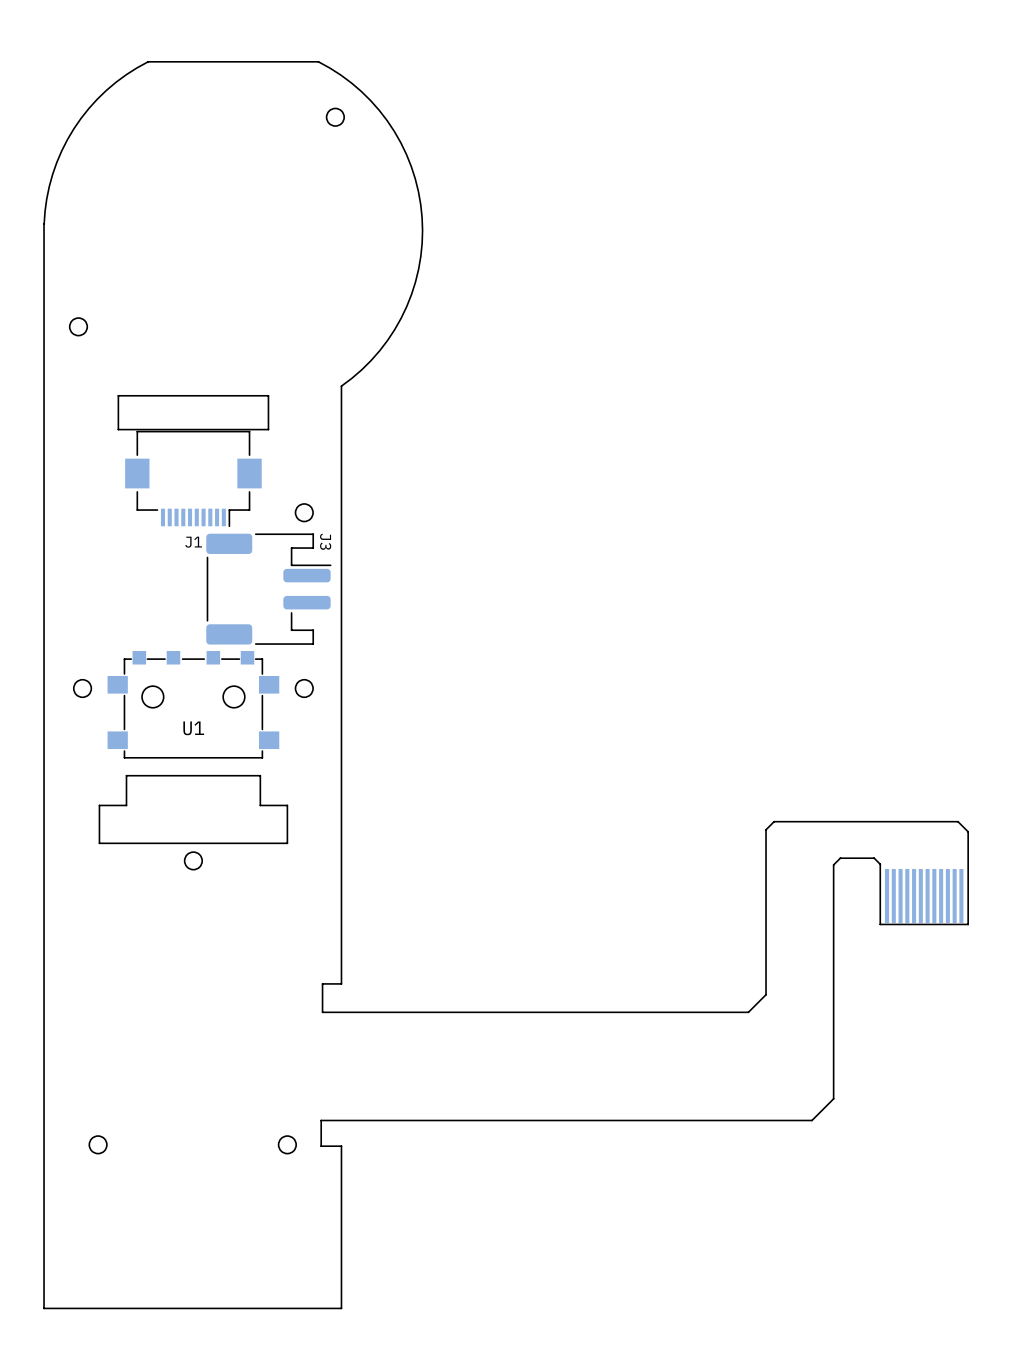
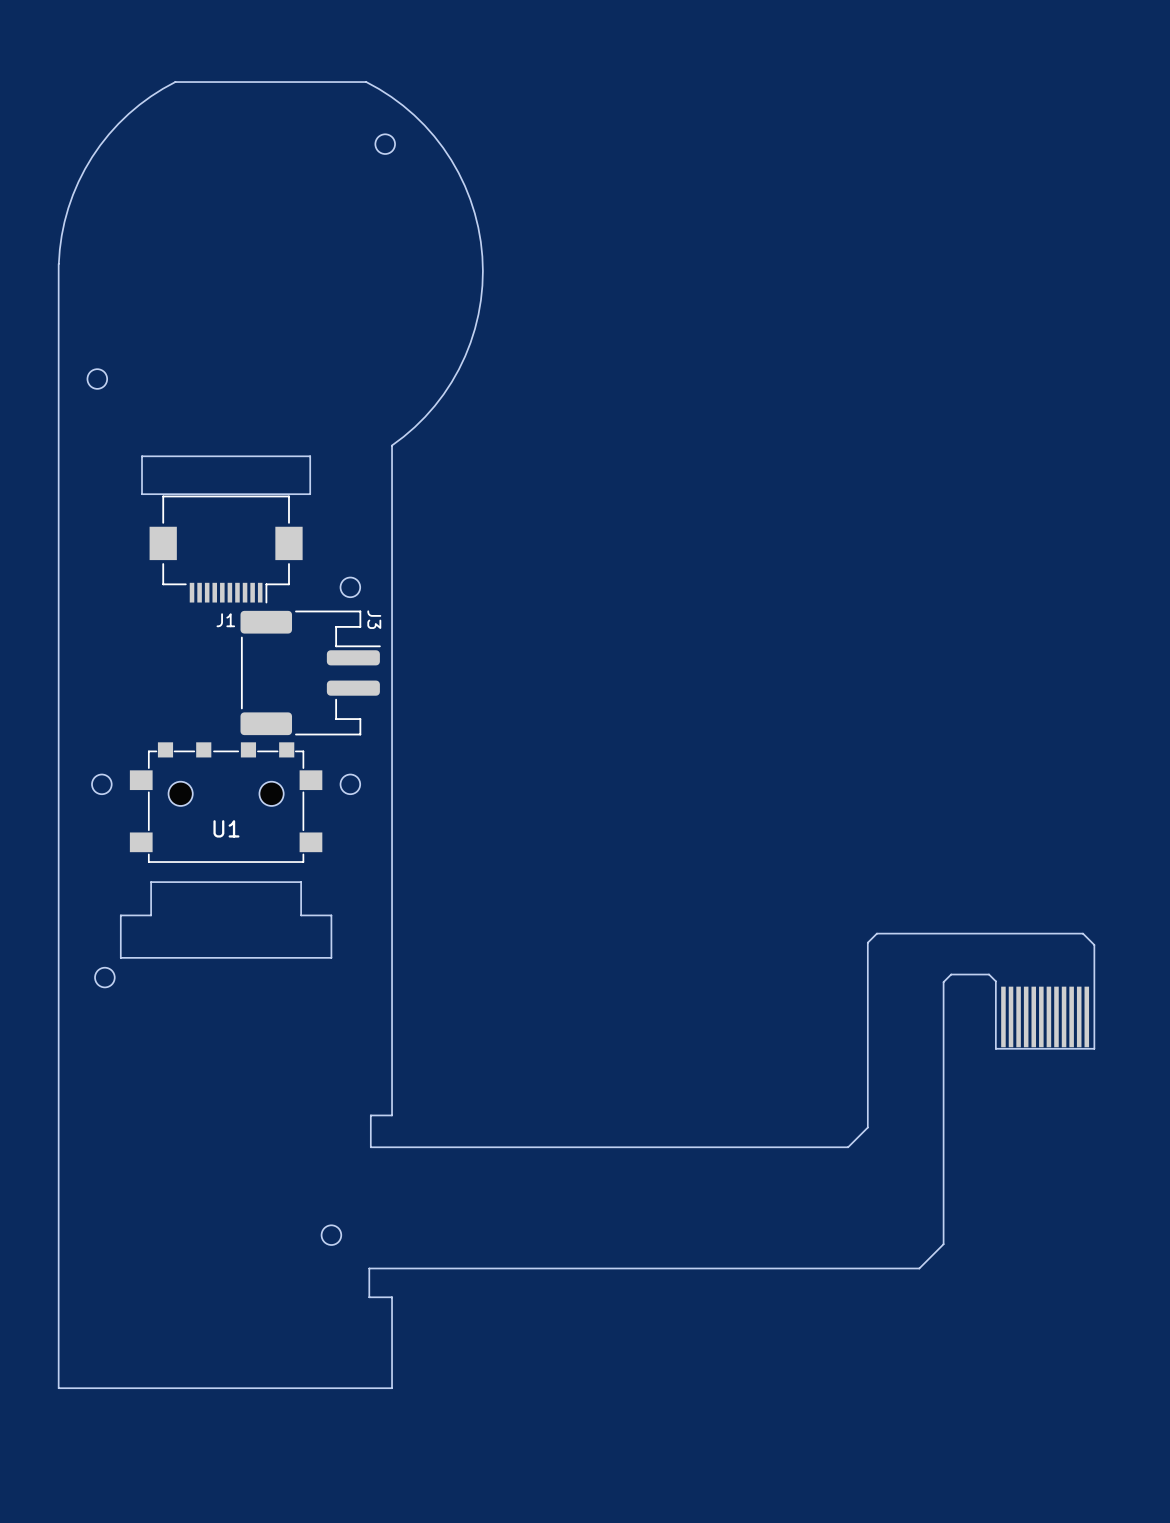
round board edge position: (193, 860) -> (104, 977)
round board edge: [88, 1135, 108, 1154] -> none
round board edge position: (287, 1144) -> (331, 1235)
board edge: (341, 1227) (341, 1308) (44, 1308) (44, 1227) -> (392, 1388) (58, 1388)

